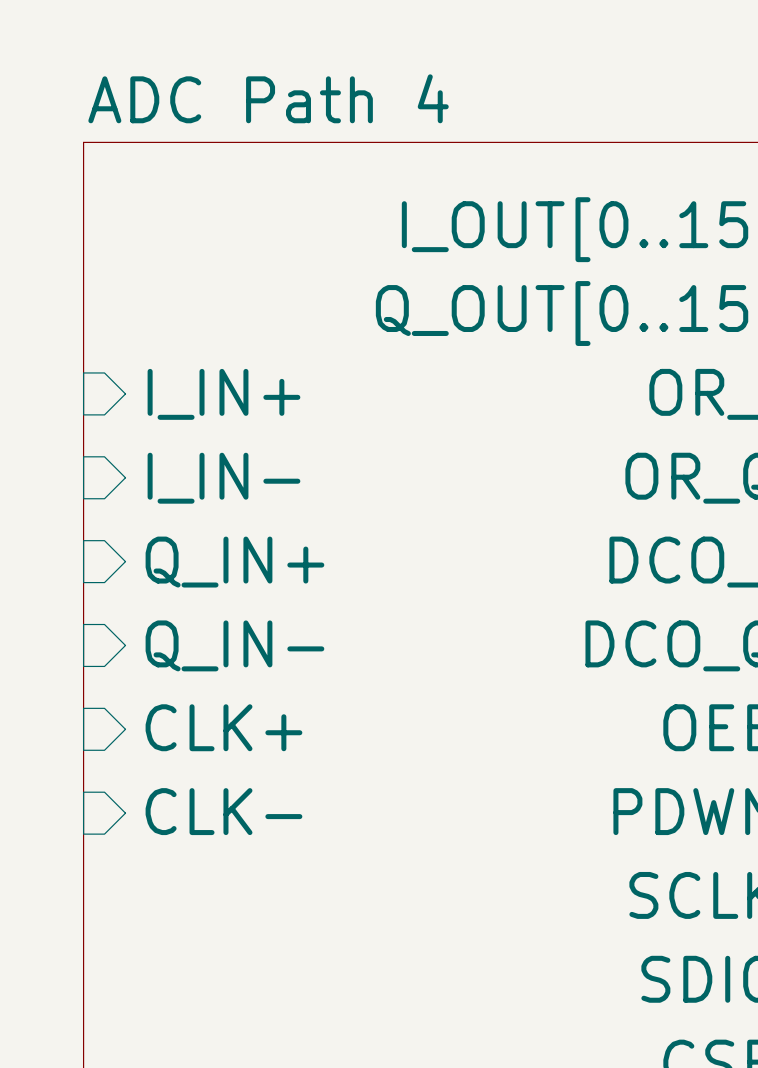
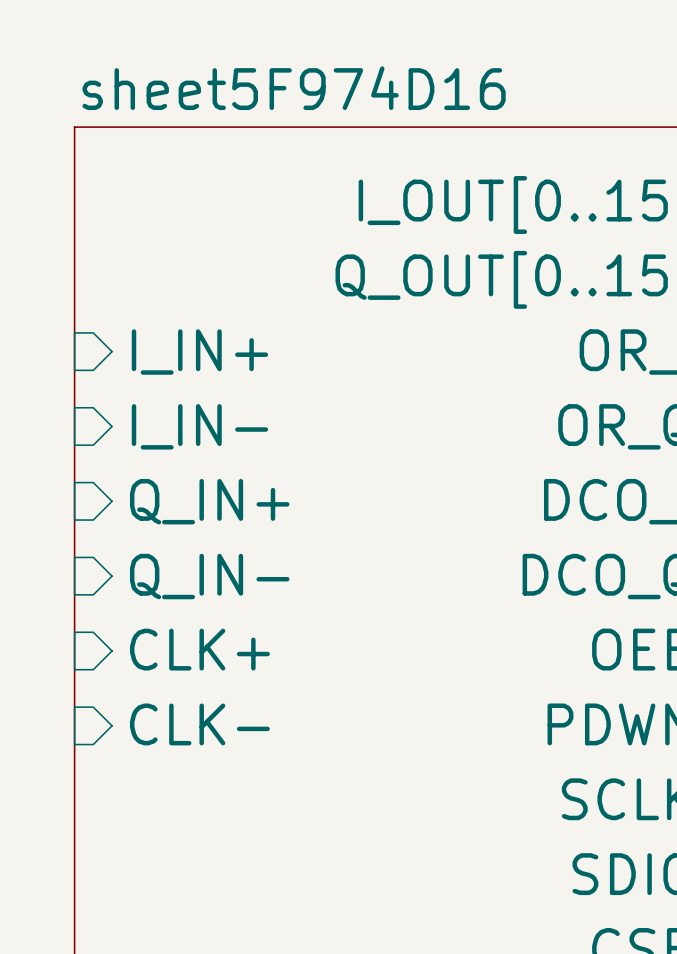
sheet ADC Path 4 name: ADC Path 4 (268, 98) -> sheet5F974D16 (294, 88)

